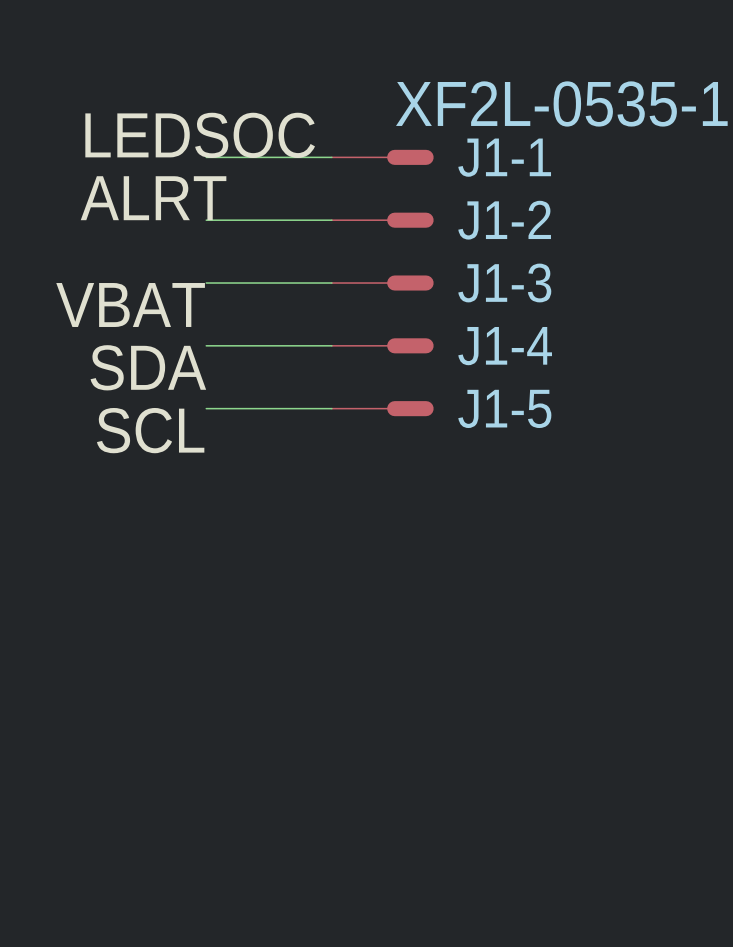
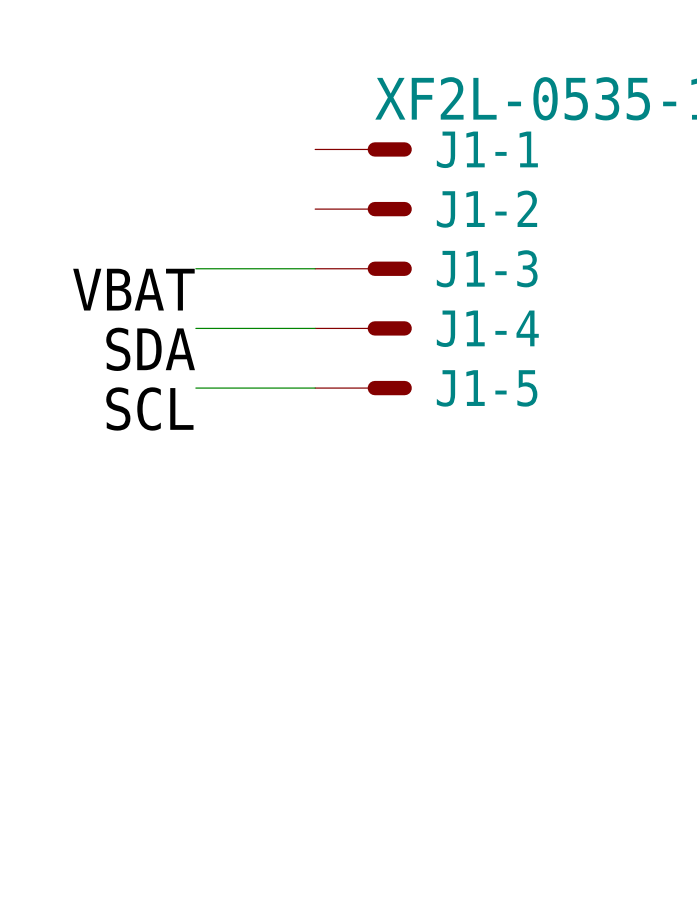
label: LEDSOC (200, 135) -> none
wire: (206, 157) (331, 157) -> none
label: ALRT (153, 198) -> none
wire: (206, 220) (331, 220) -> none

